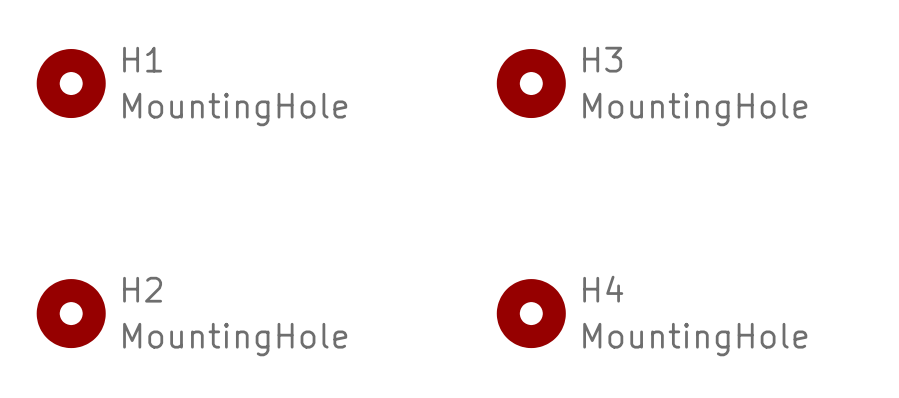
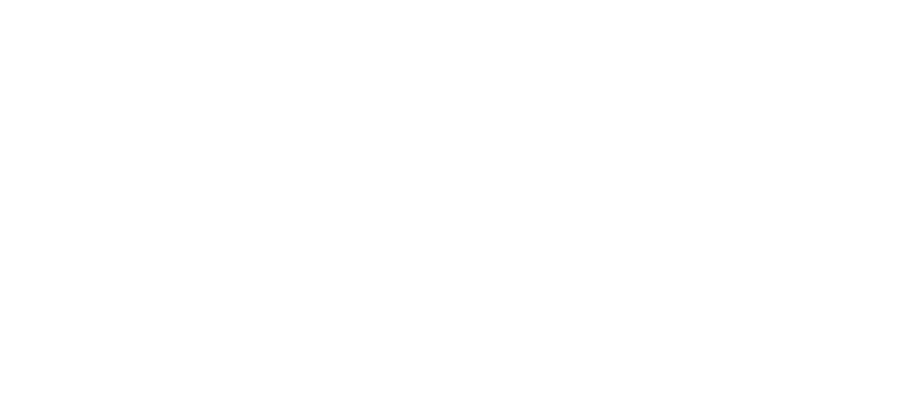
H1: MountingHole (71, 83) -> none
H3: MountingHole (531, 83) -> none
H2: MountingHole (71, 313) -> none
H4: MountingHole (531, 313) -> none

